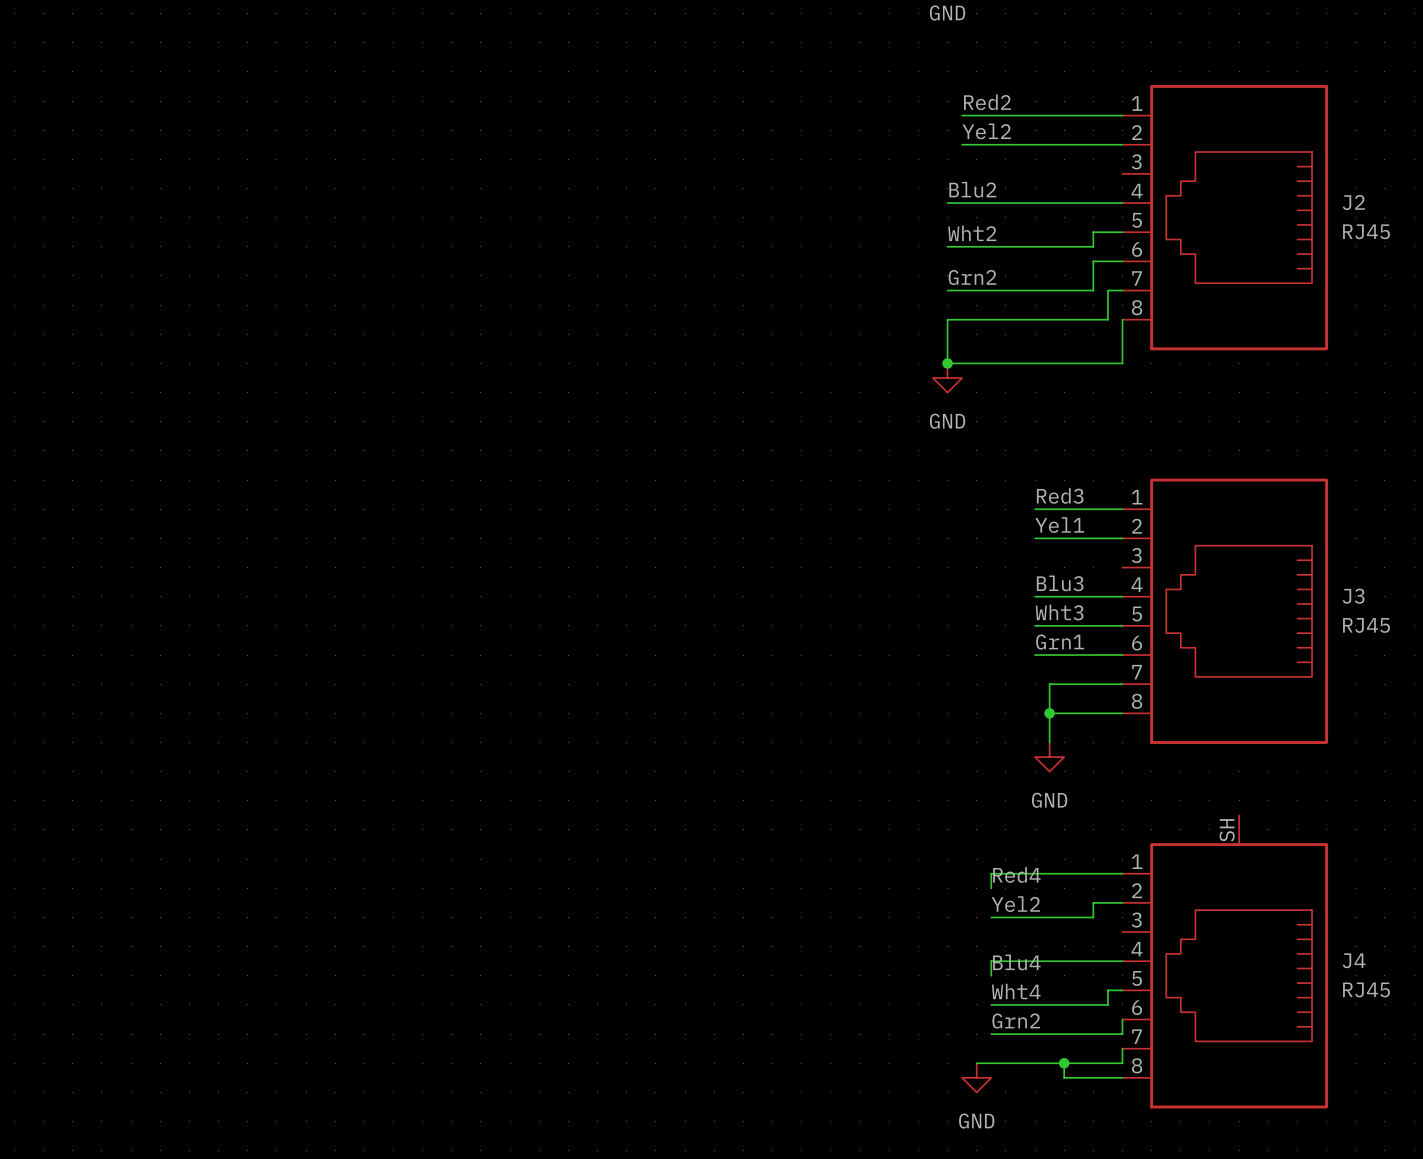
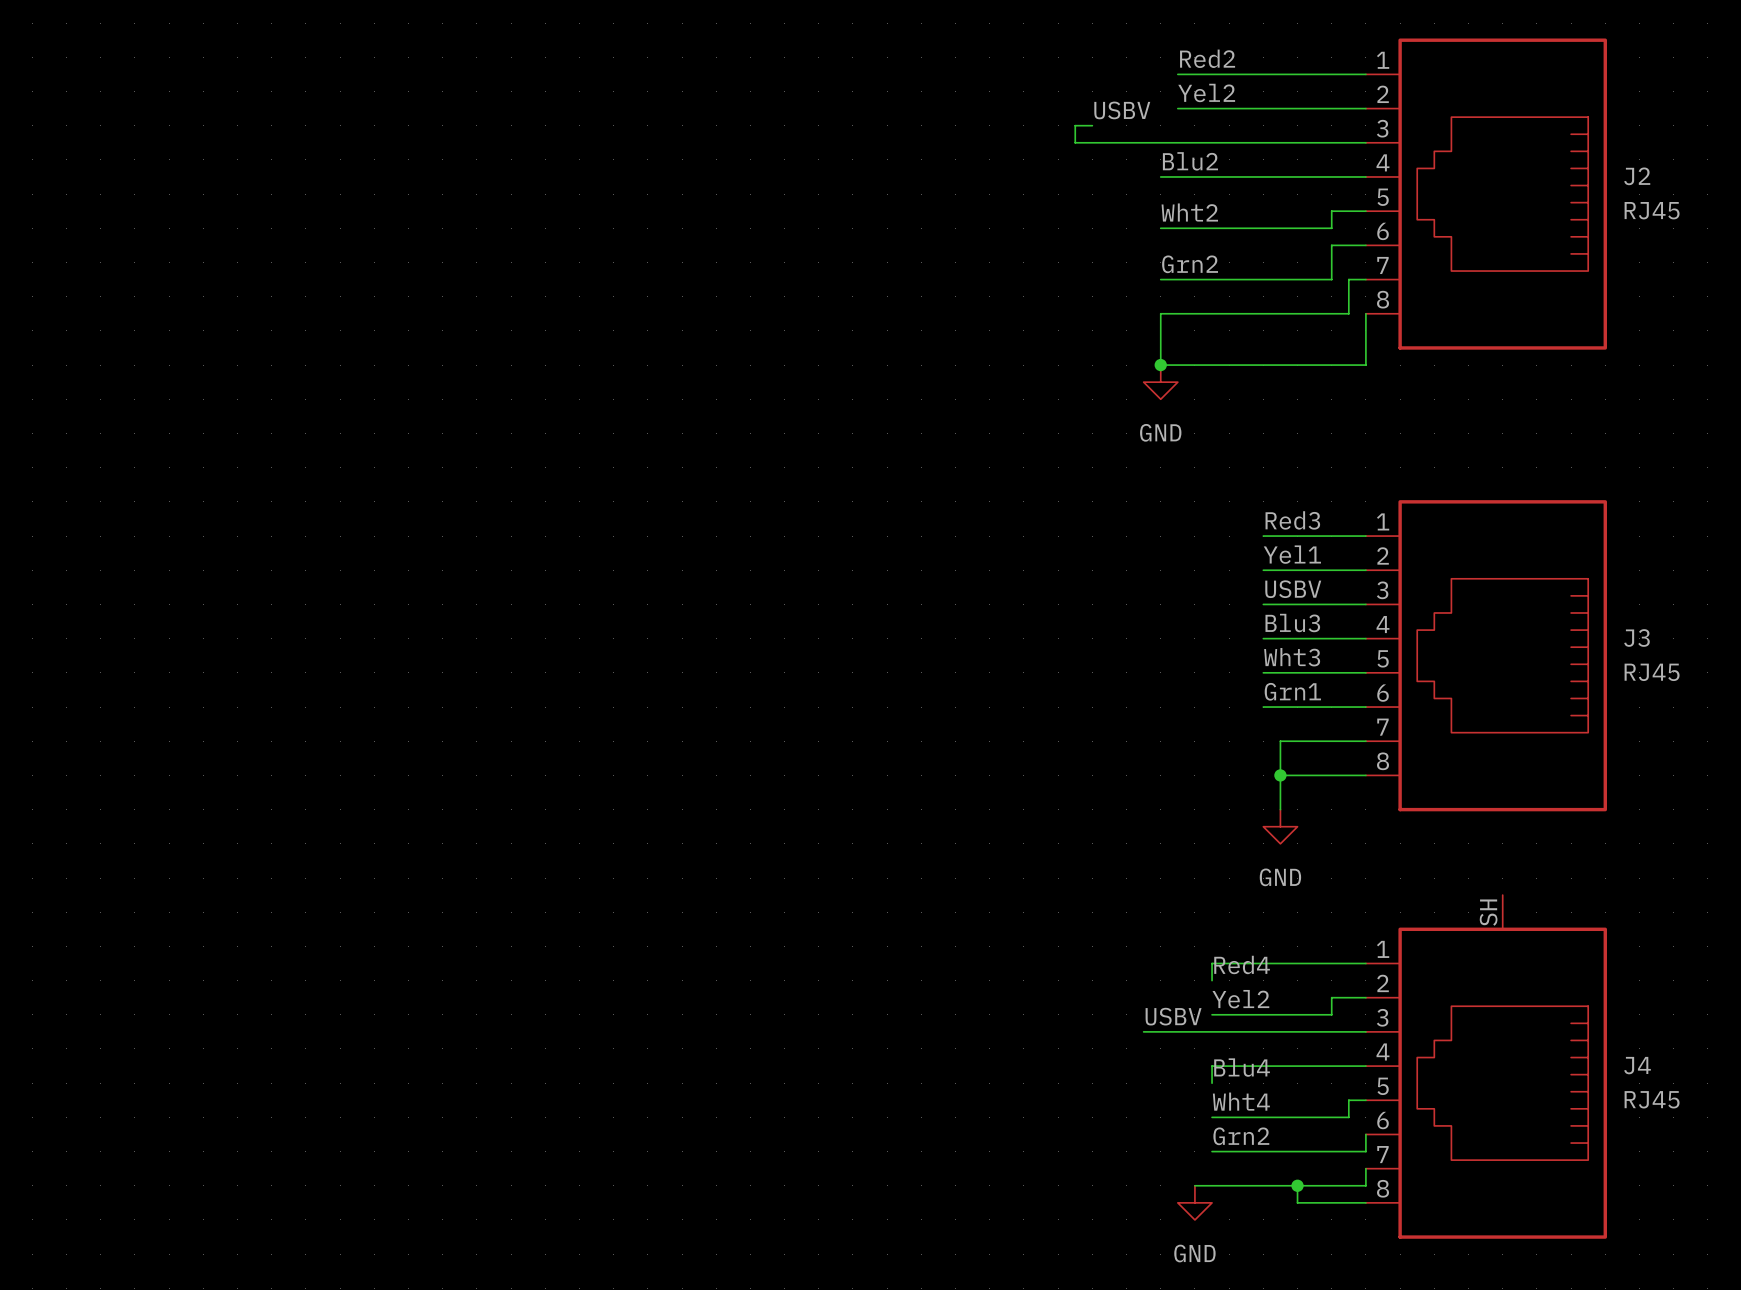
label: none -> USBV (1122, 110)
wire: none -> (1092, 125) (1075, 125) (1075, 142) (1365, 142)
label: none -> USBV (1293, 589)
wire: none -> (1263, 604) (1365, 604)
label: none -> USBV (1173, 1016)
wire: none -> (1143, 1031) (1365, 1031)

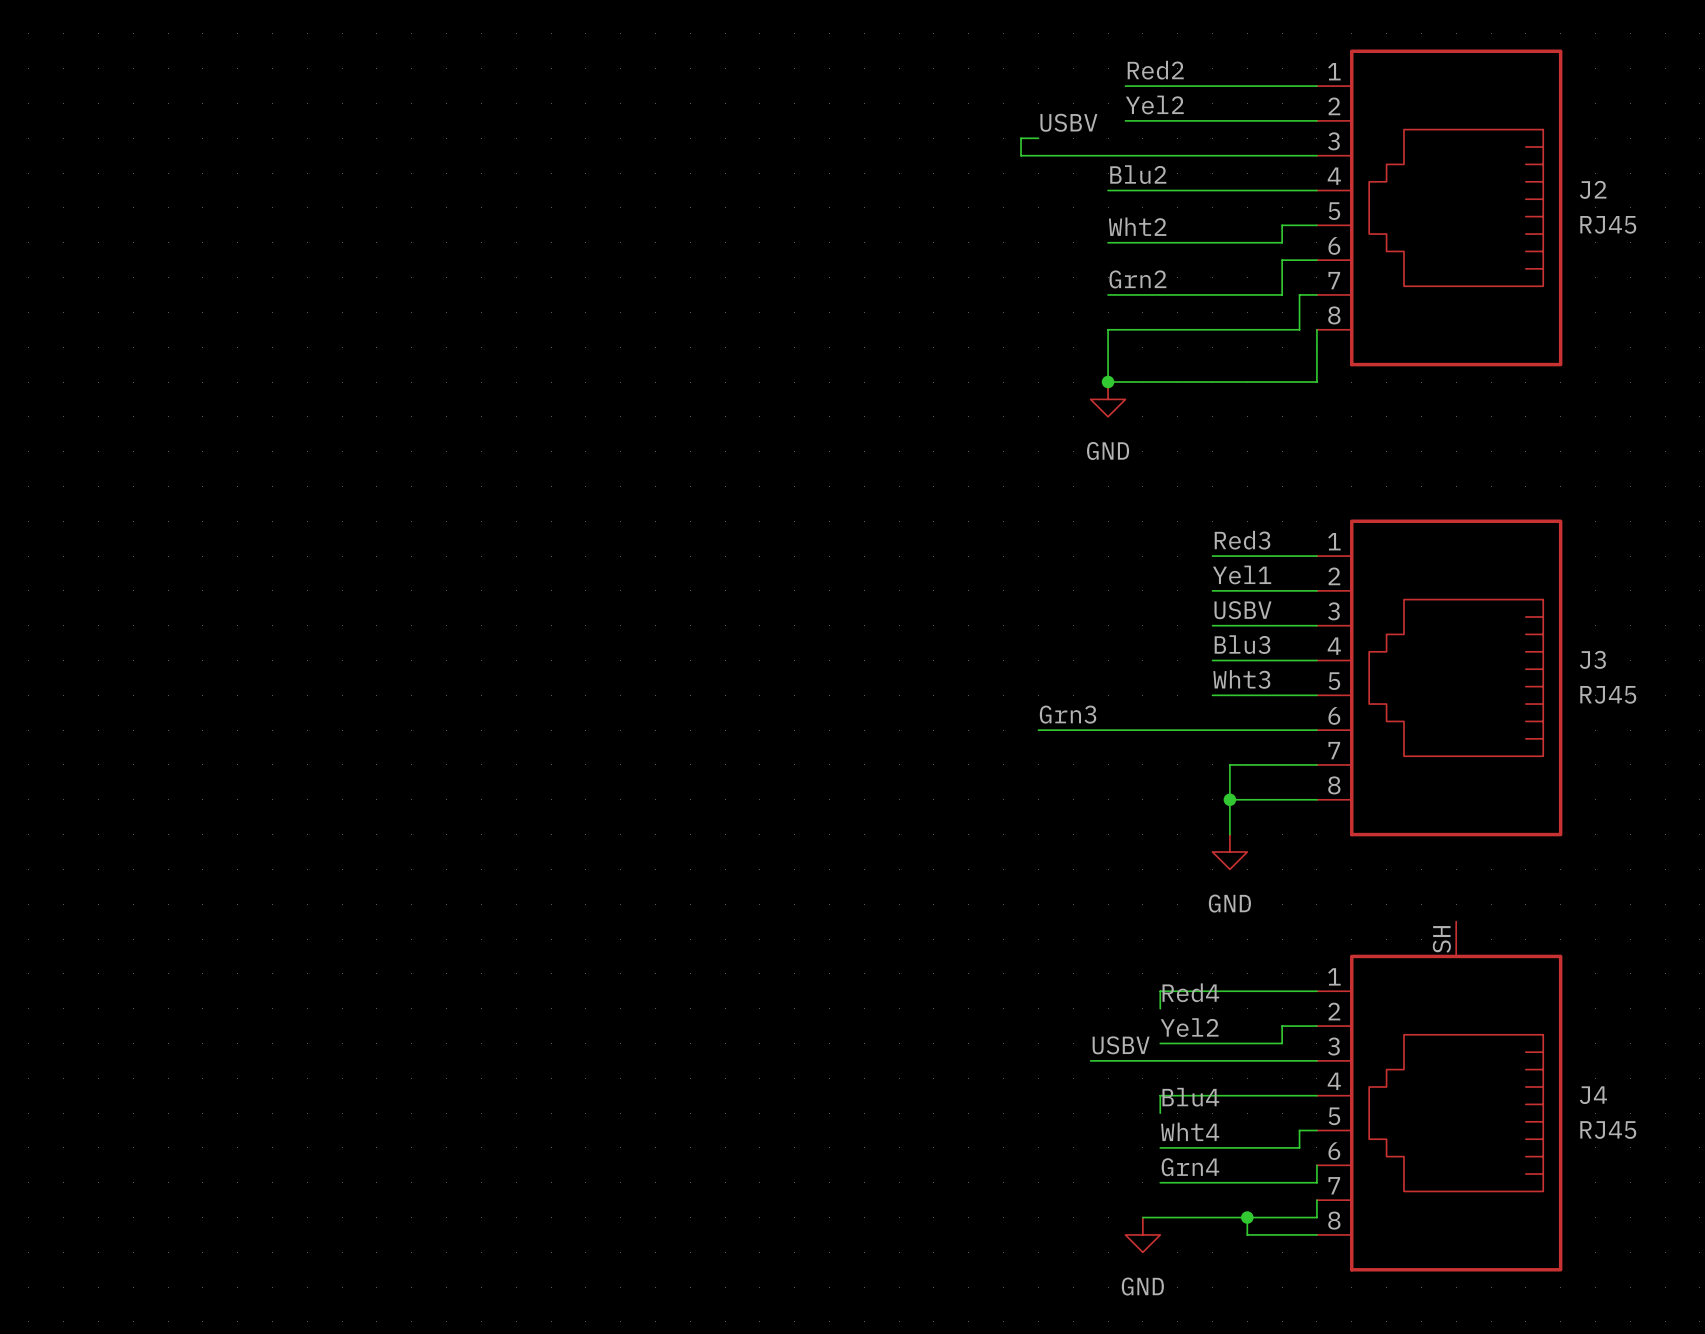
label: none -> Grn3 (1068, 714)
label: Grn1 (1292, 691) -> none
wire: none -> (1038, 730) (1212, 730)
label: Grn2 (1241, 1136) -> Grn4 (1190, 1167)

